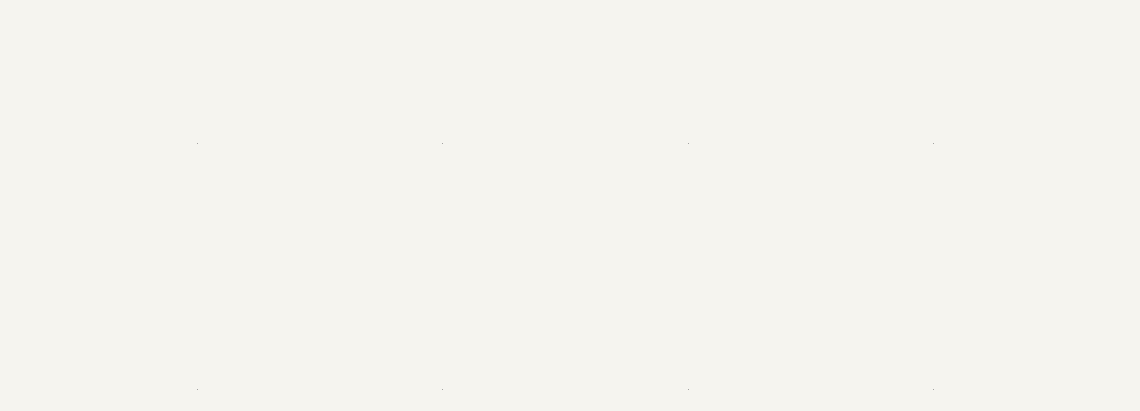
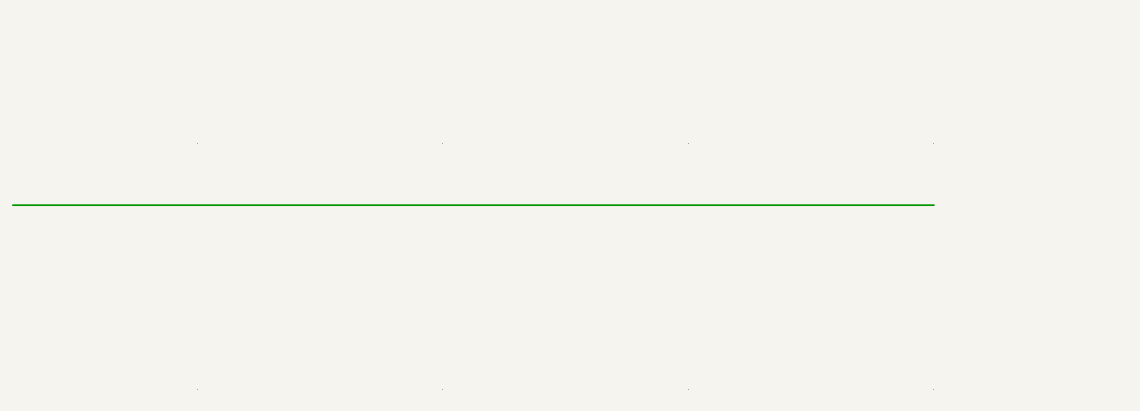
wire: none -> (12, 205) (933, 205)

